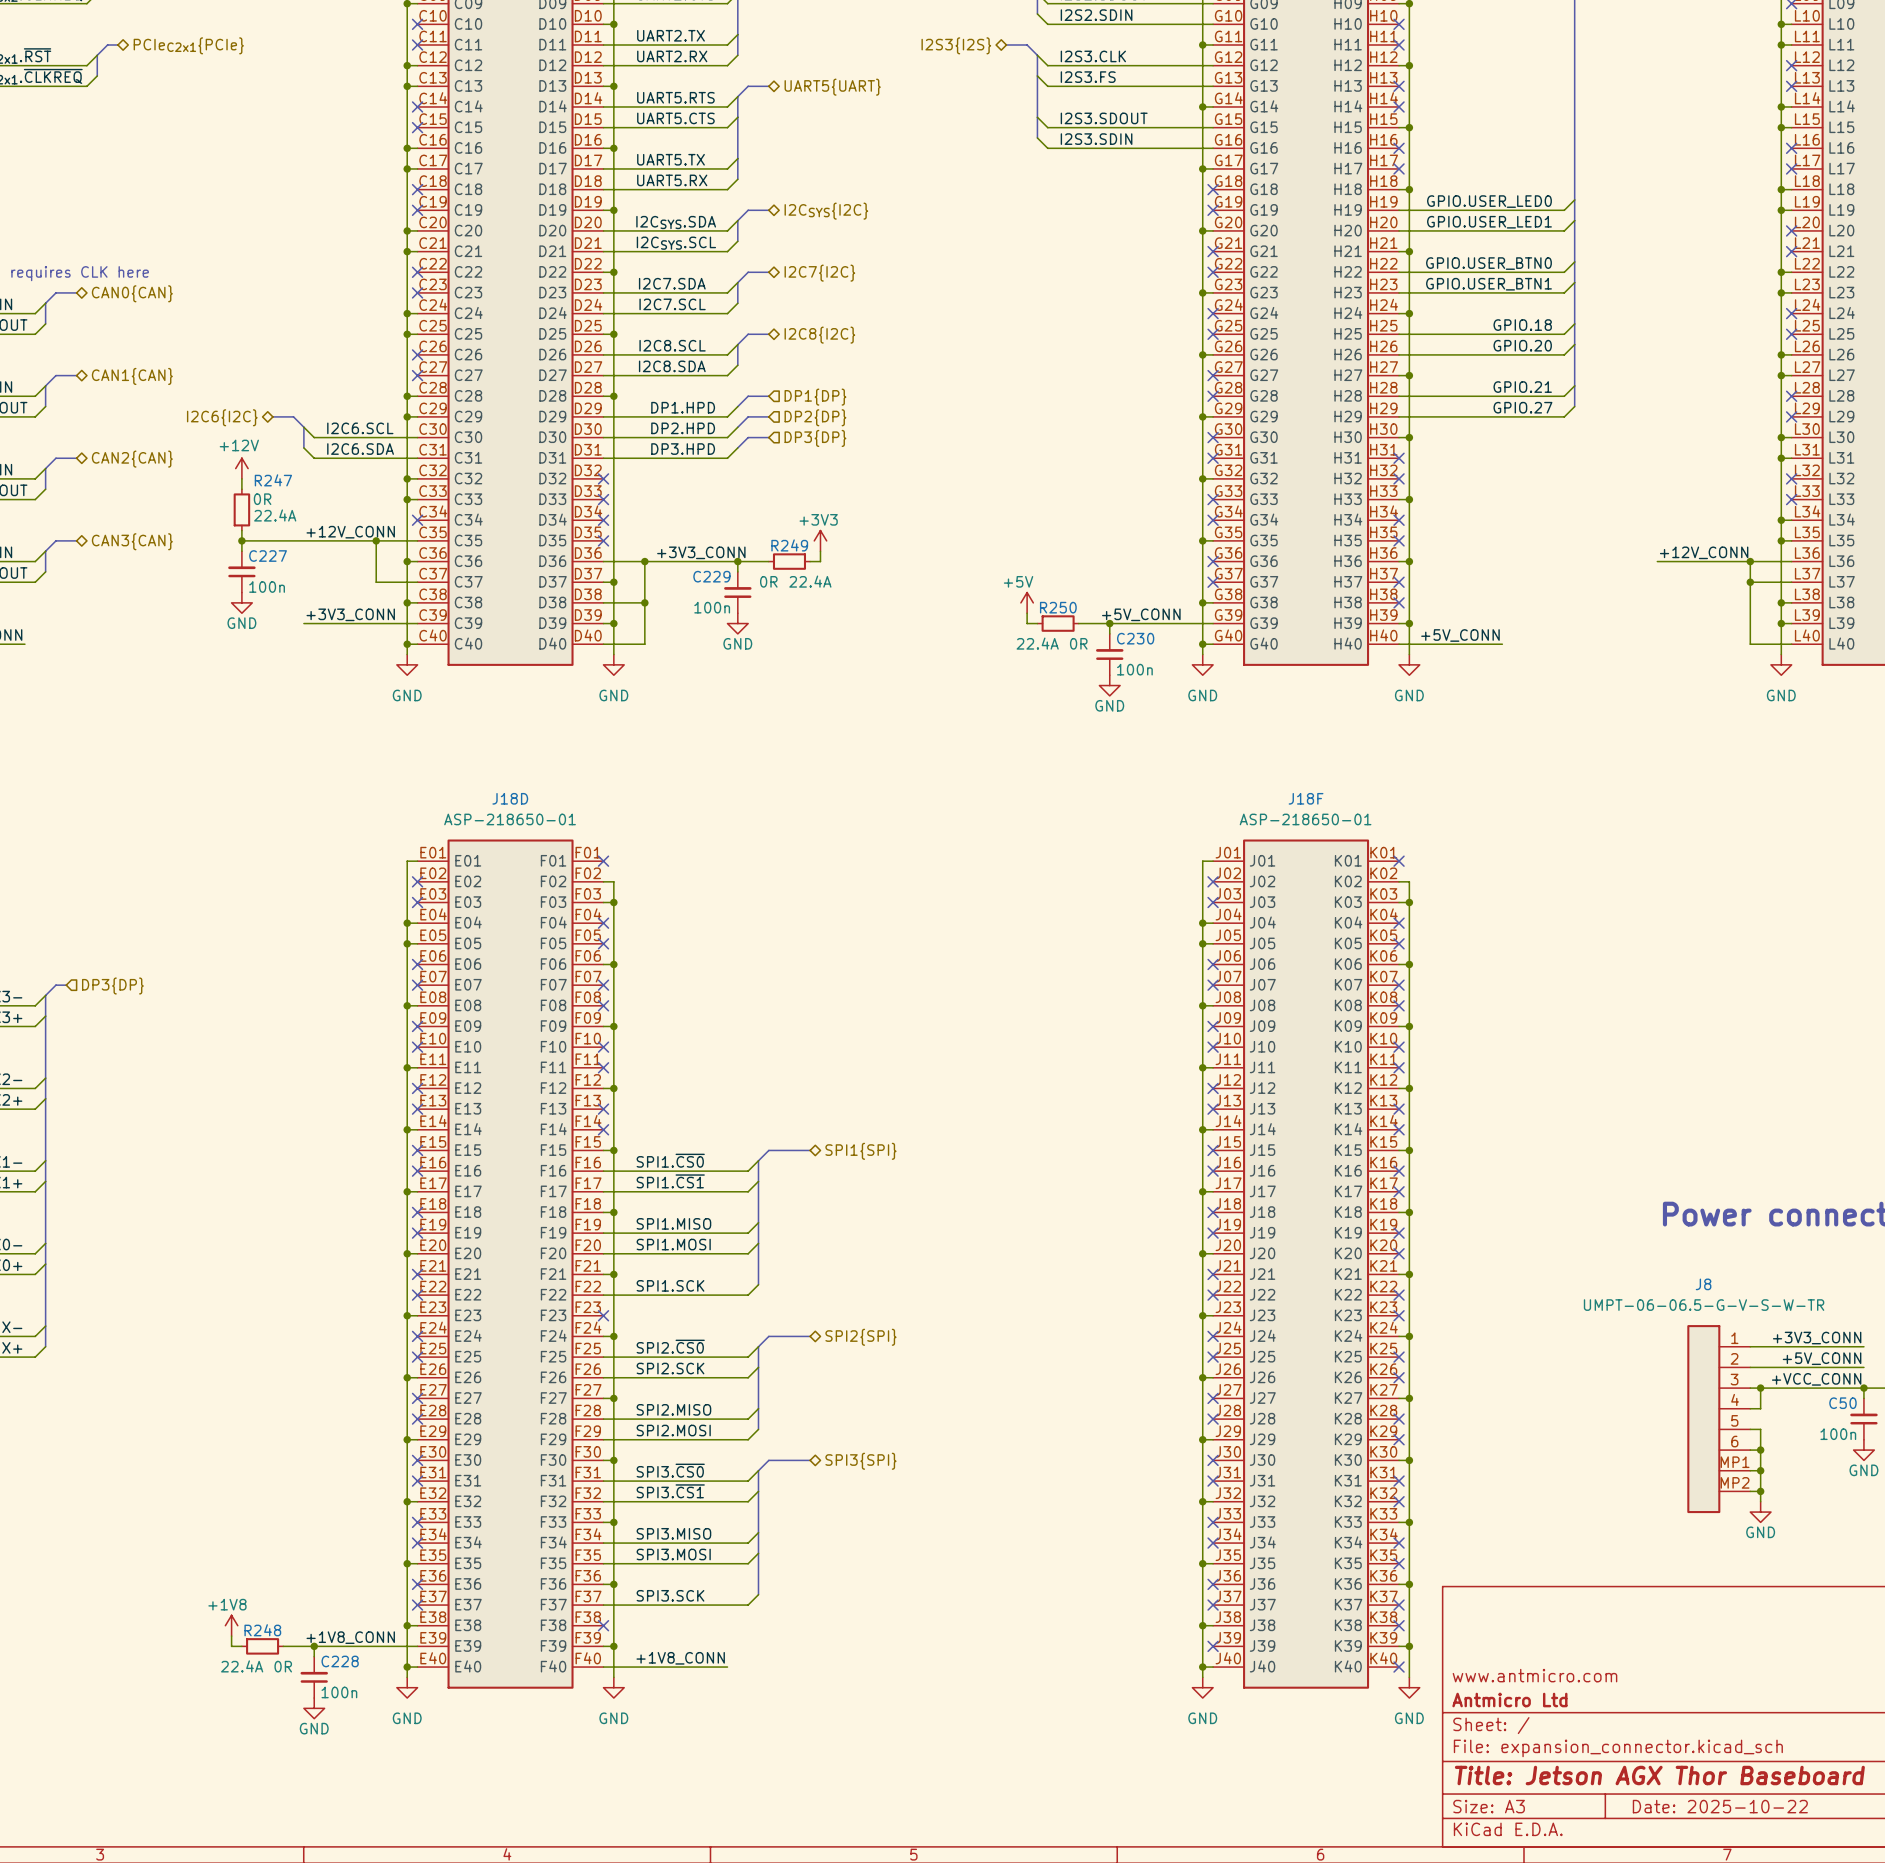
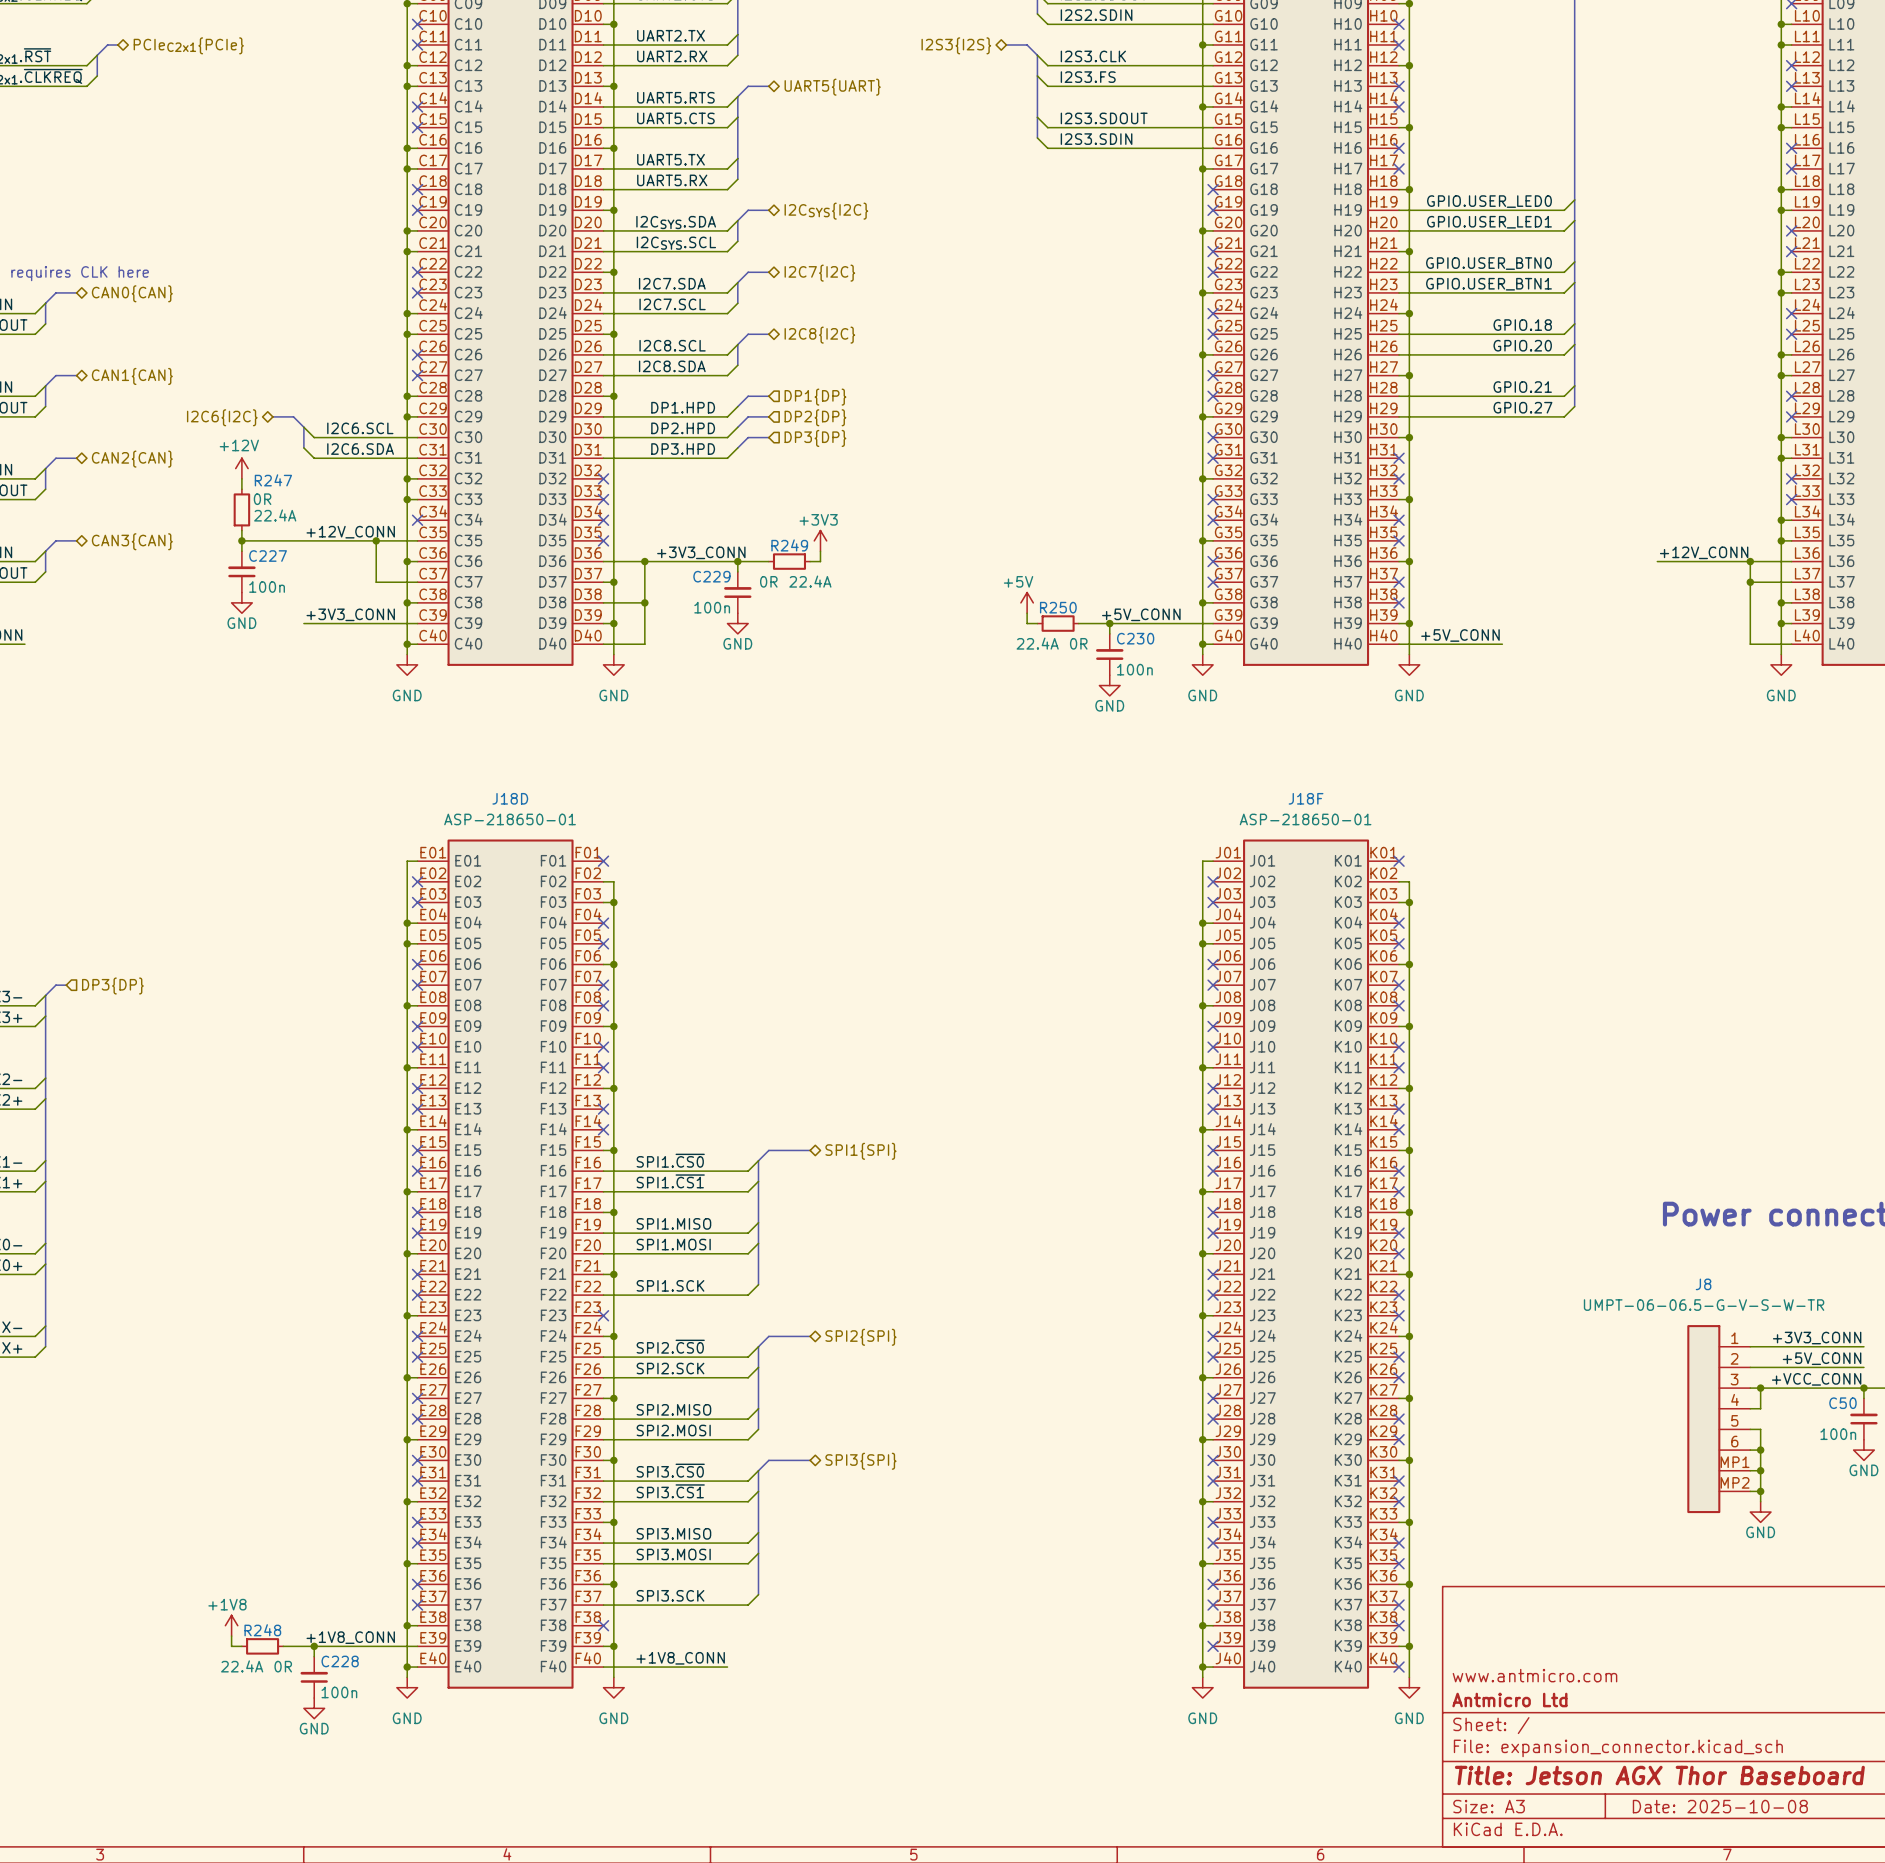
title block: Date: 2025-10-22 (1720, 1806) -> Date: 2025-10-08 (1720, 1806)

